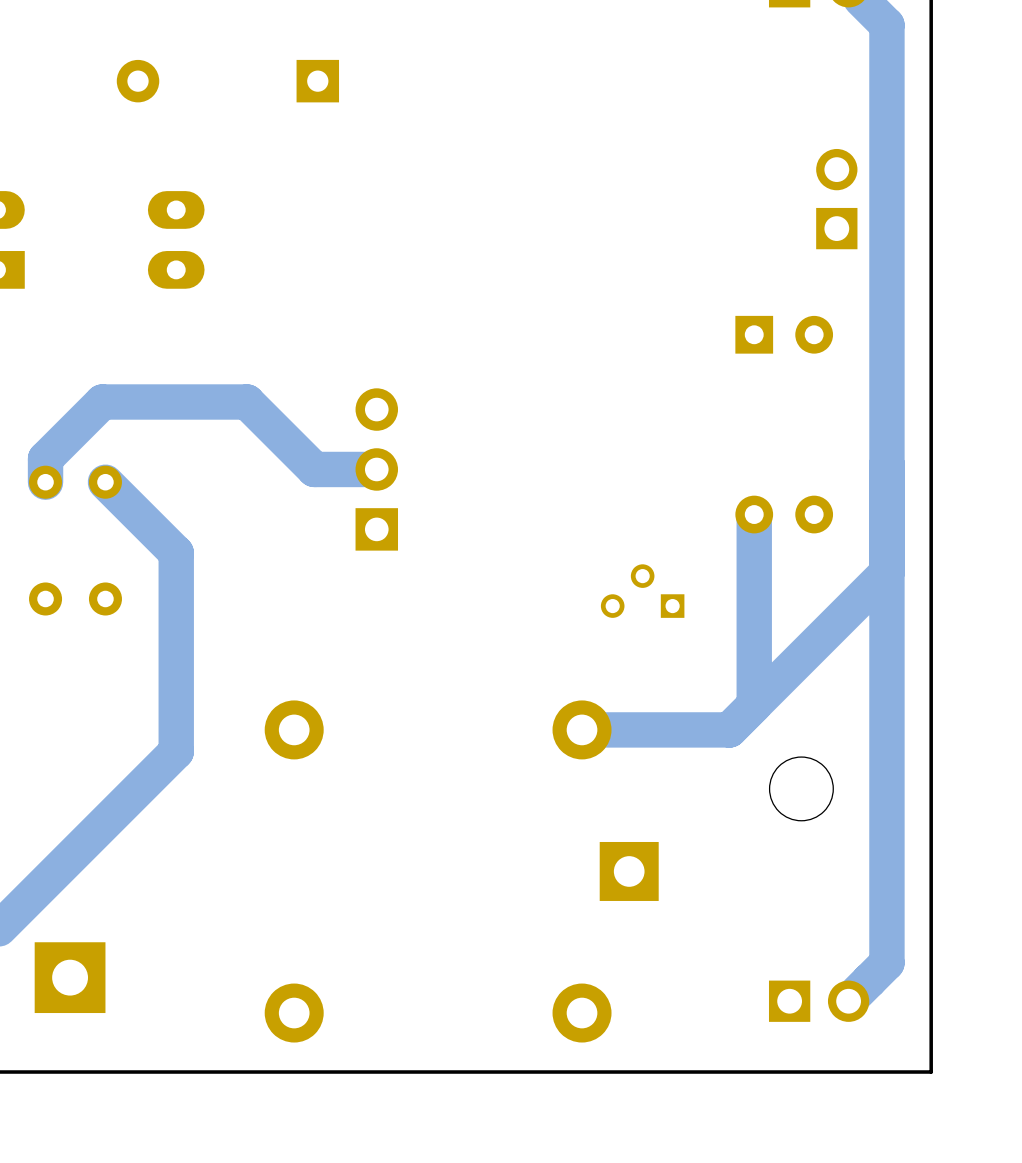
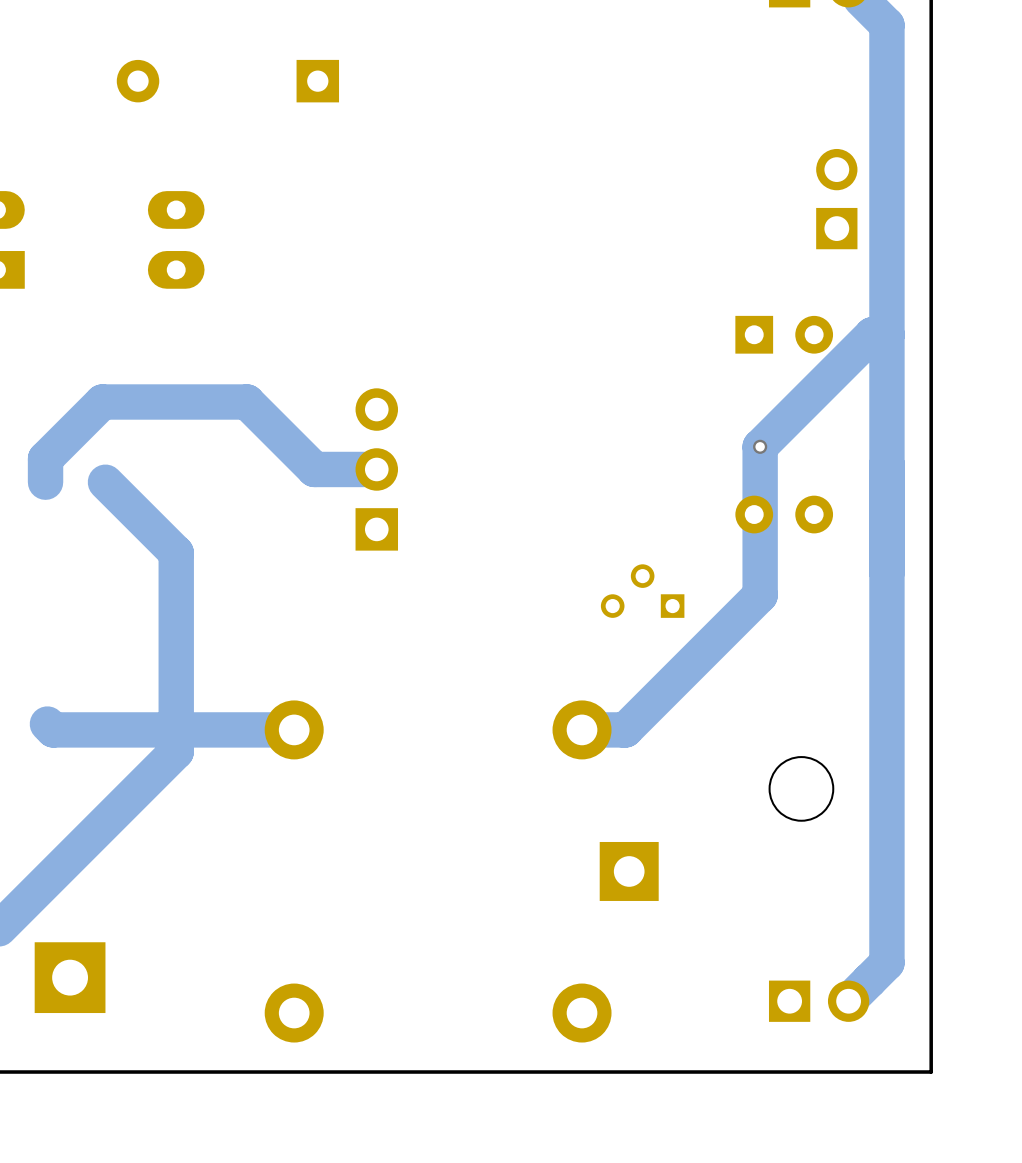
via: none -> (760, 446)
part: (75, 482) -> none
track: (754, 514) (754, 705) -> none
track: (886, 572) (729, 729) (625, 729) -> (886, 334) (872, 334) (760, 446) (760, 595) (625, 729)
part: (75, 598) -> none
track: none -> (47, 724) (53, 729) (294, 729)

